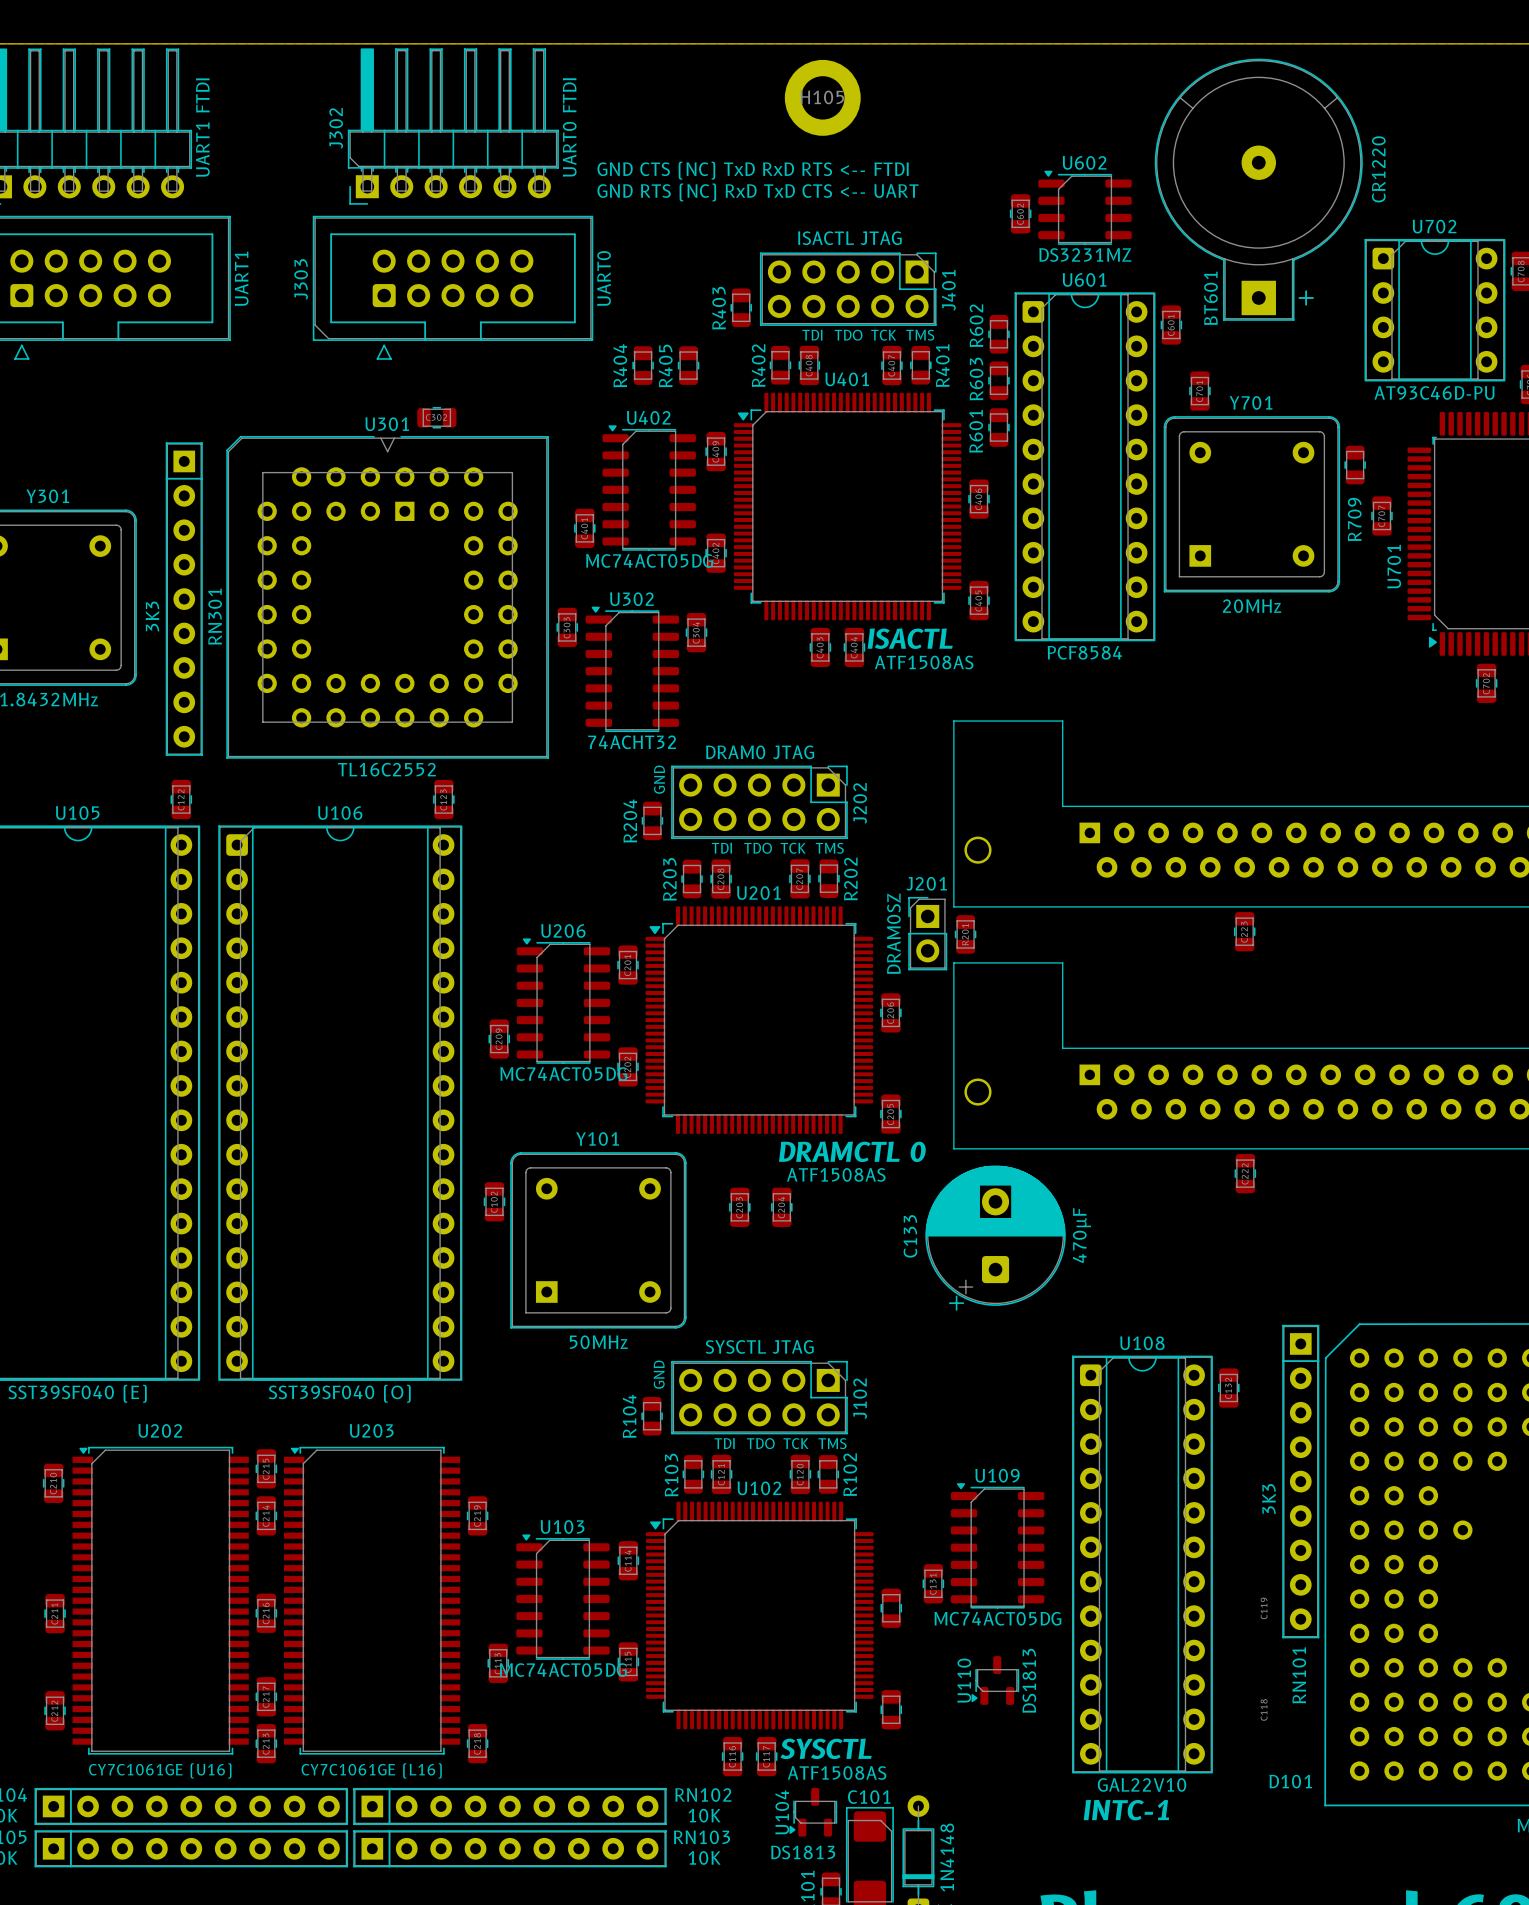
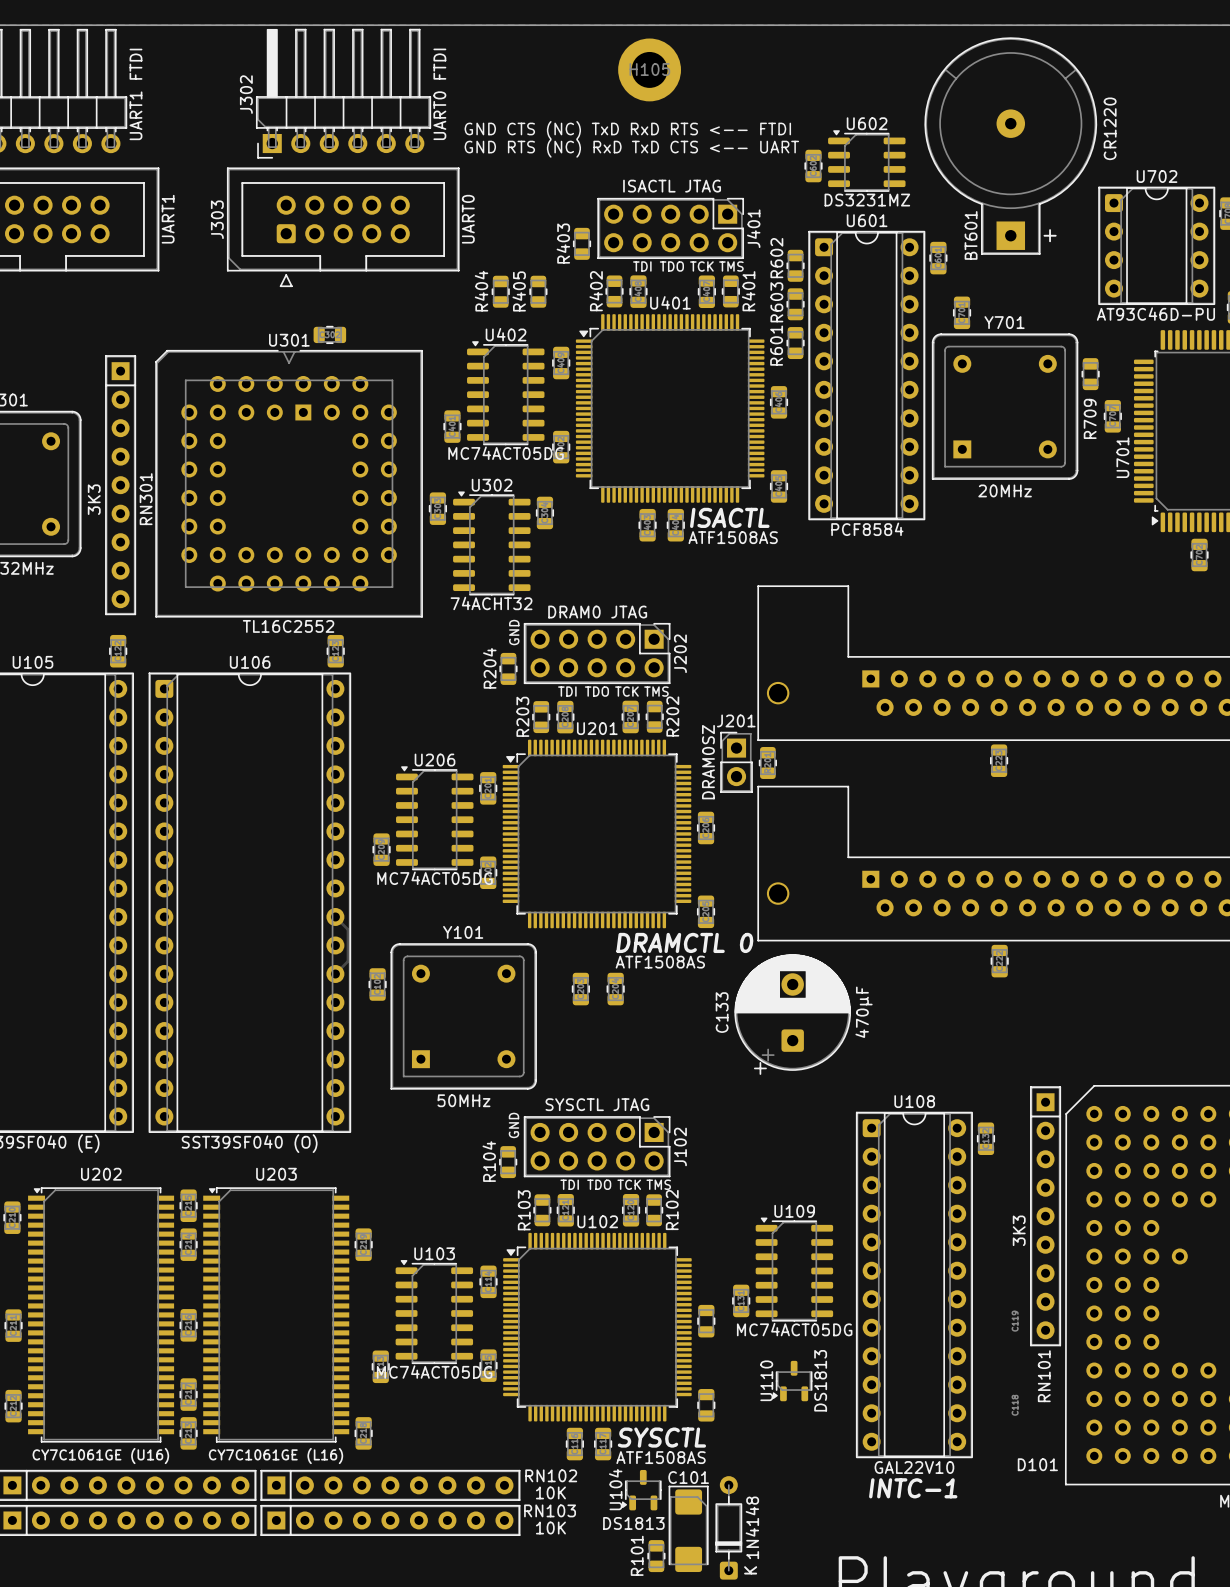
track: none -> (335, 916) (348, 929) (348, 961) (335, 973)

